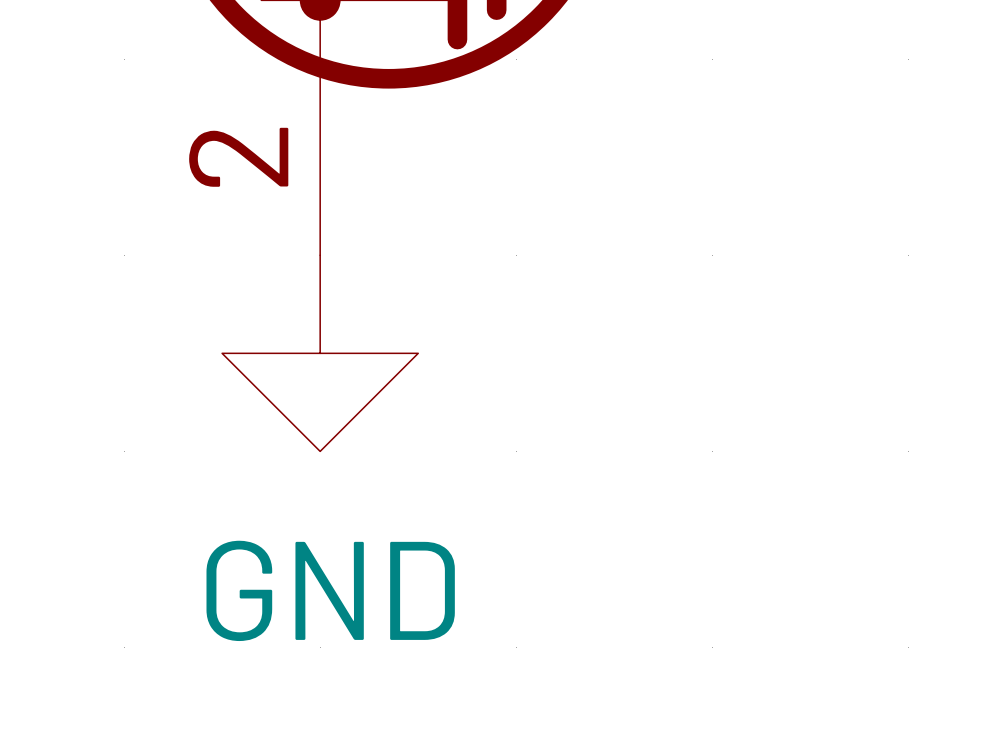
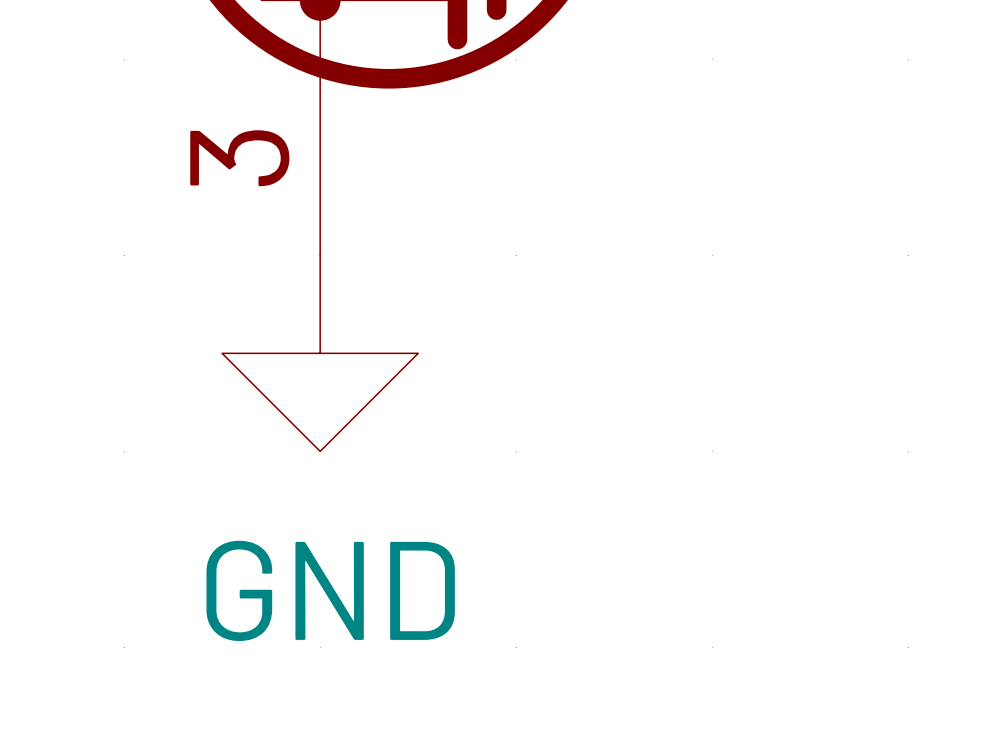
part pin number: 2 (238, 157) -> 3 (239, 158)

